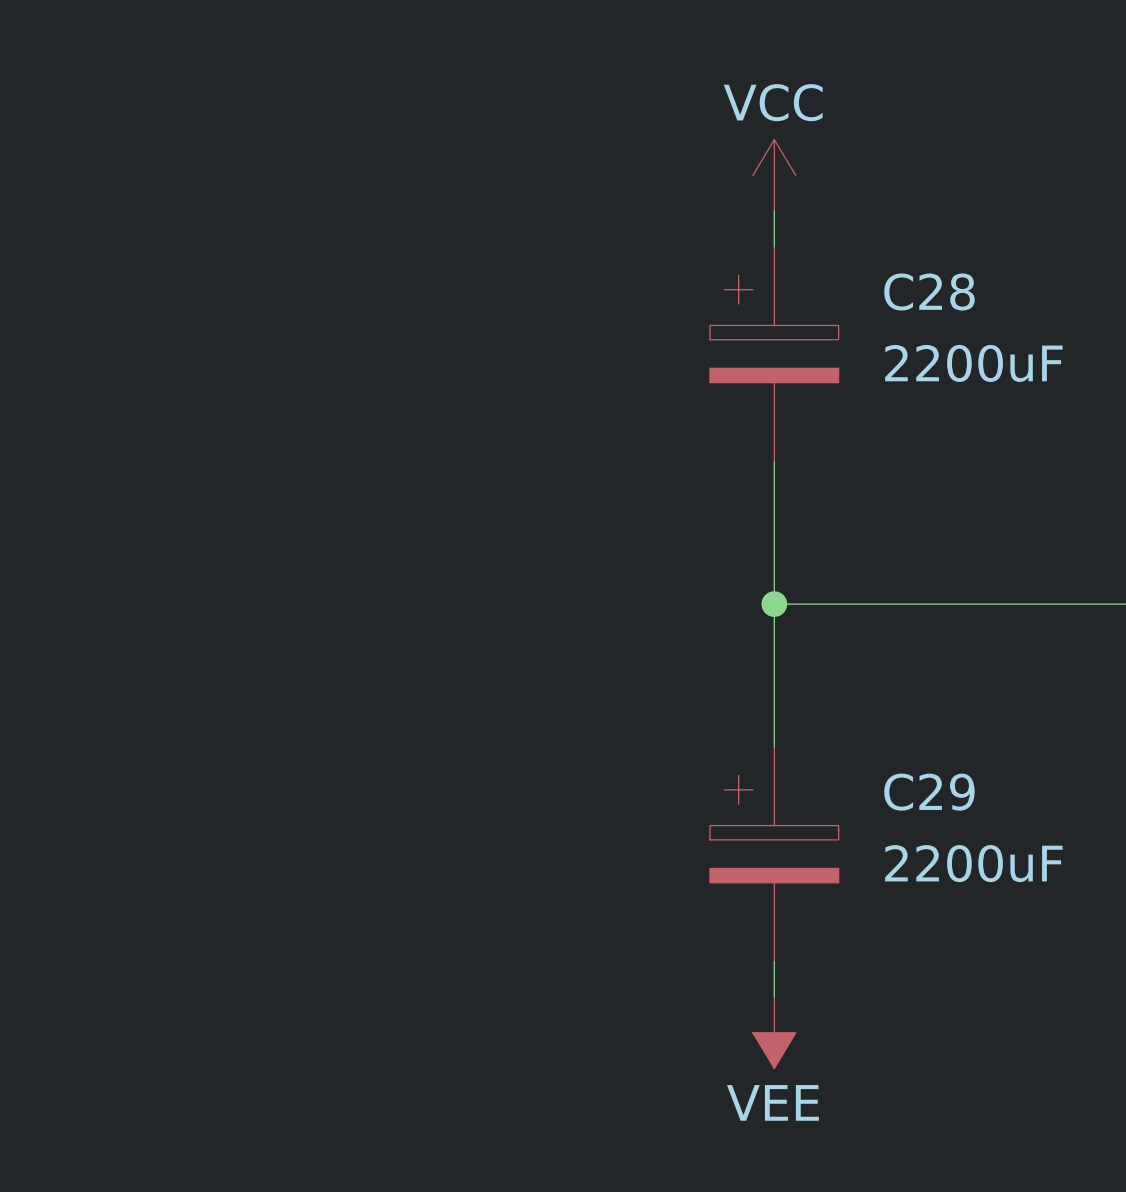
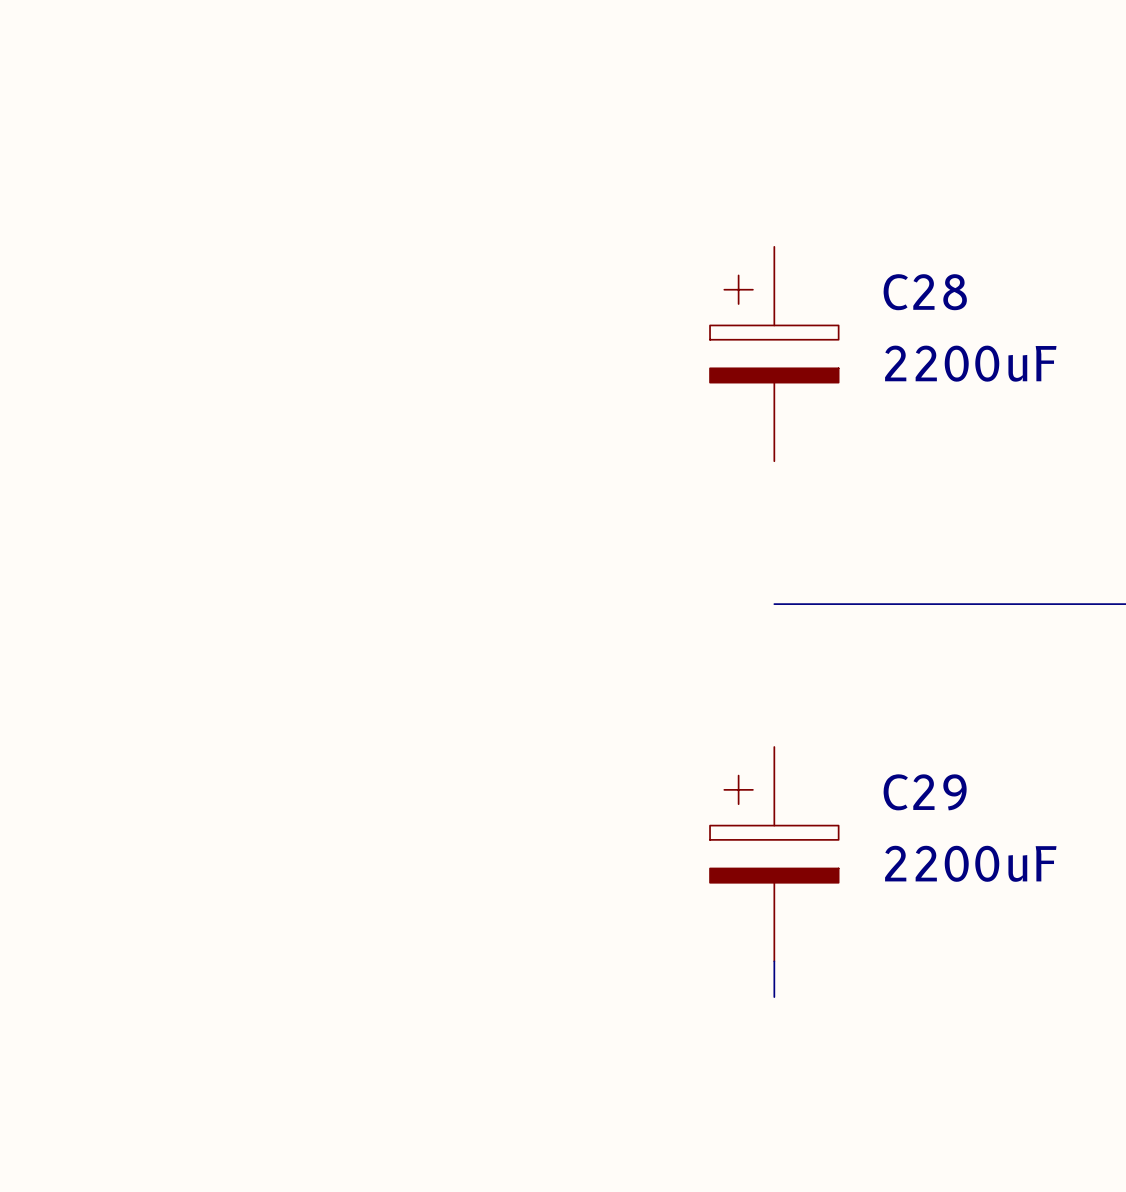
power symbol: VCC (774, 175) -> none
wire: (774, 211) (774, 246) -> none
wire: (774, 461) (774, 747) -> none
junction: (774, 604) -> none
power symbol: VEE (774, 1032) -> none

